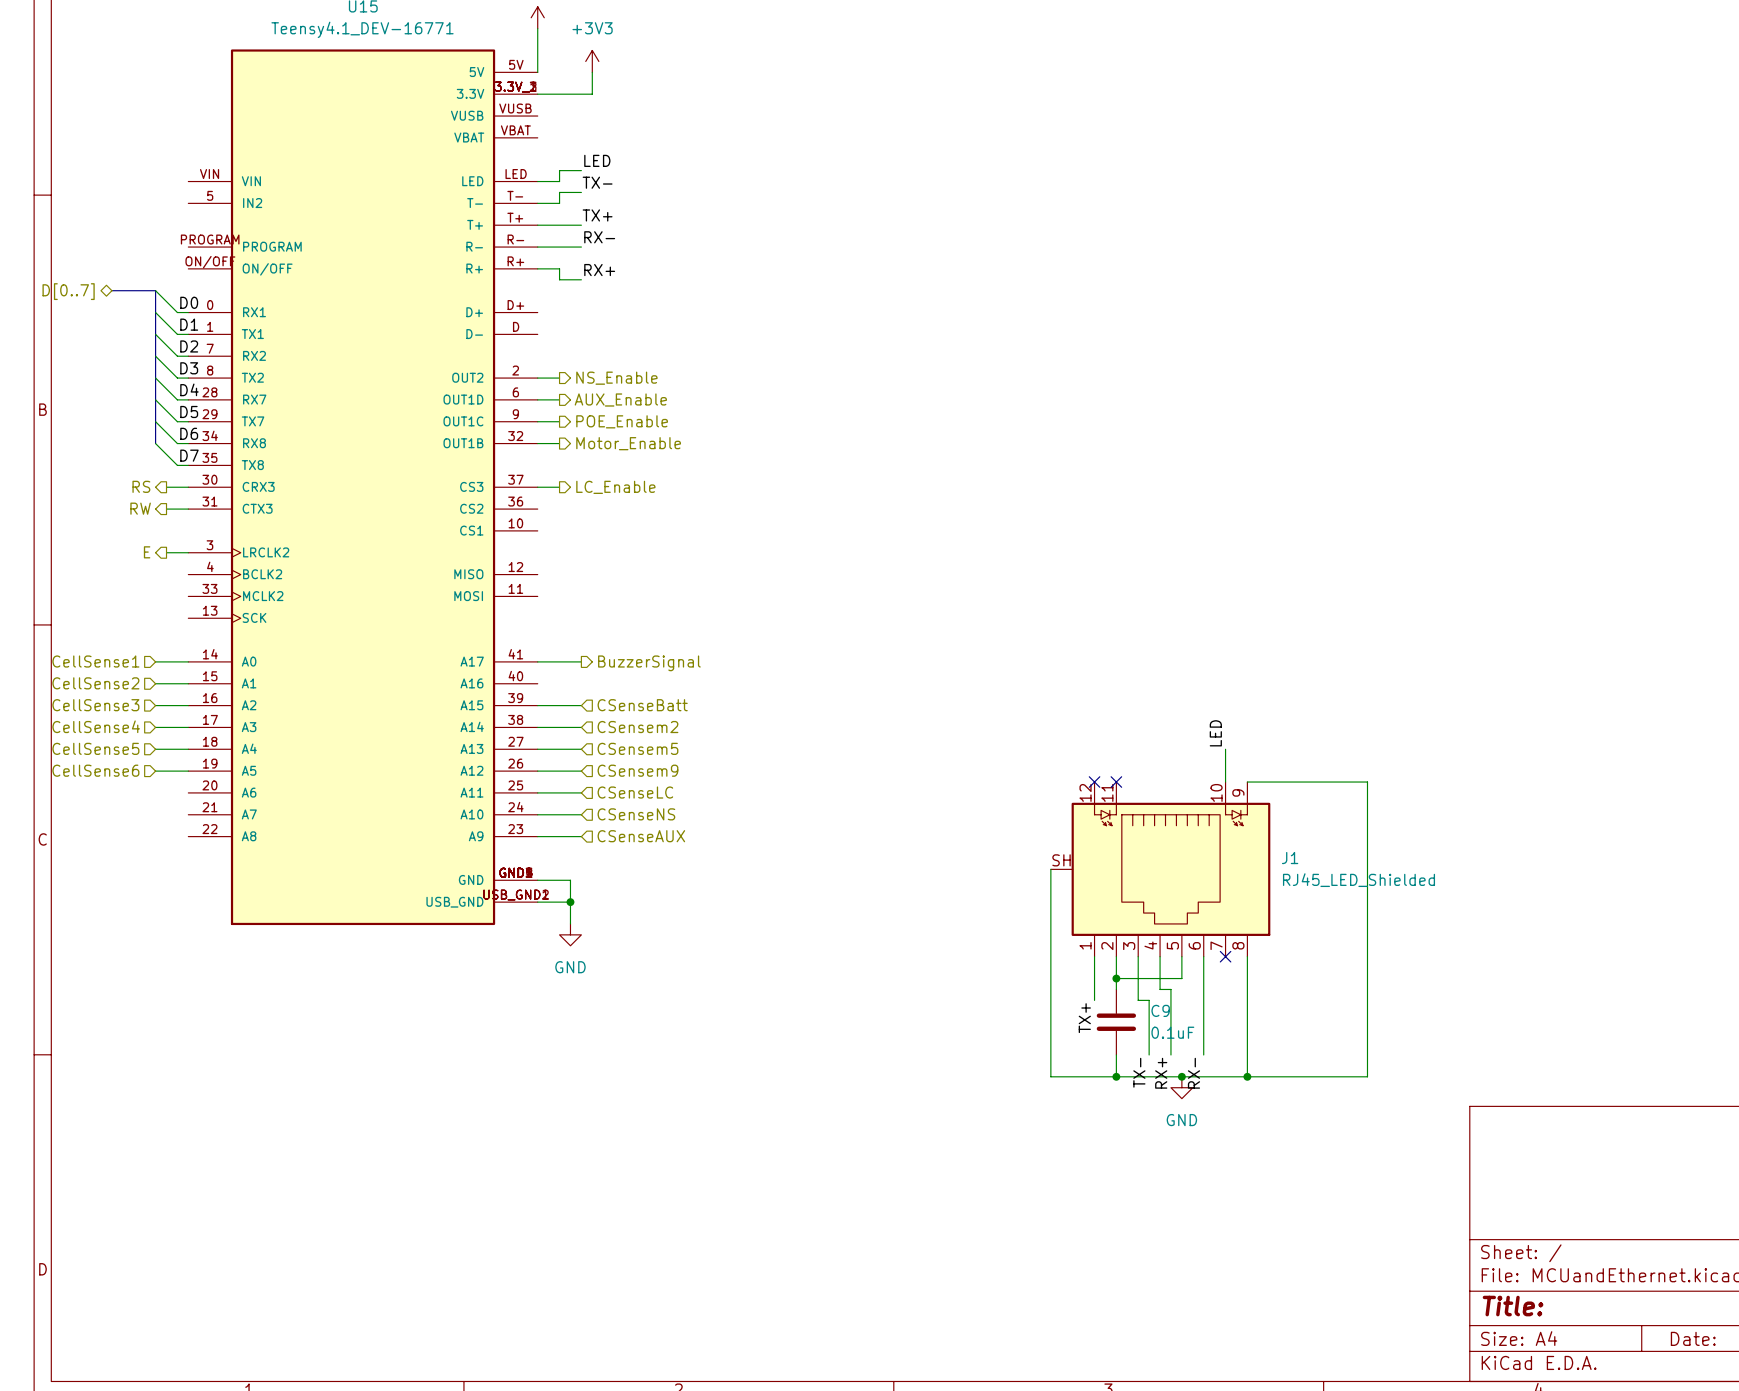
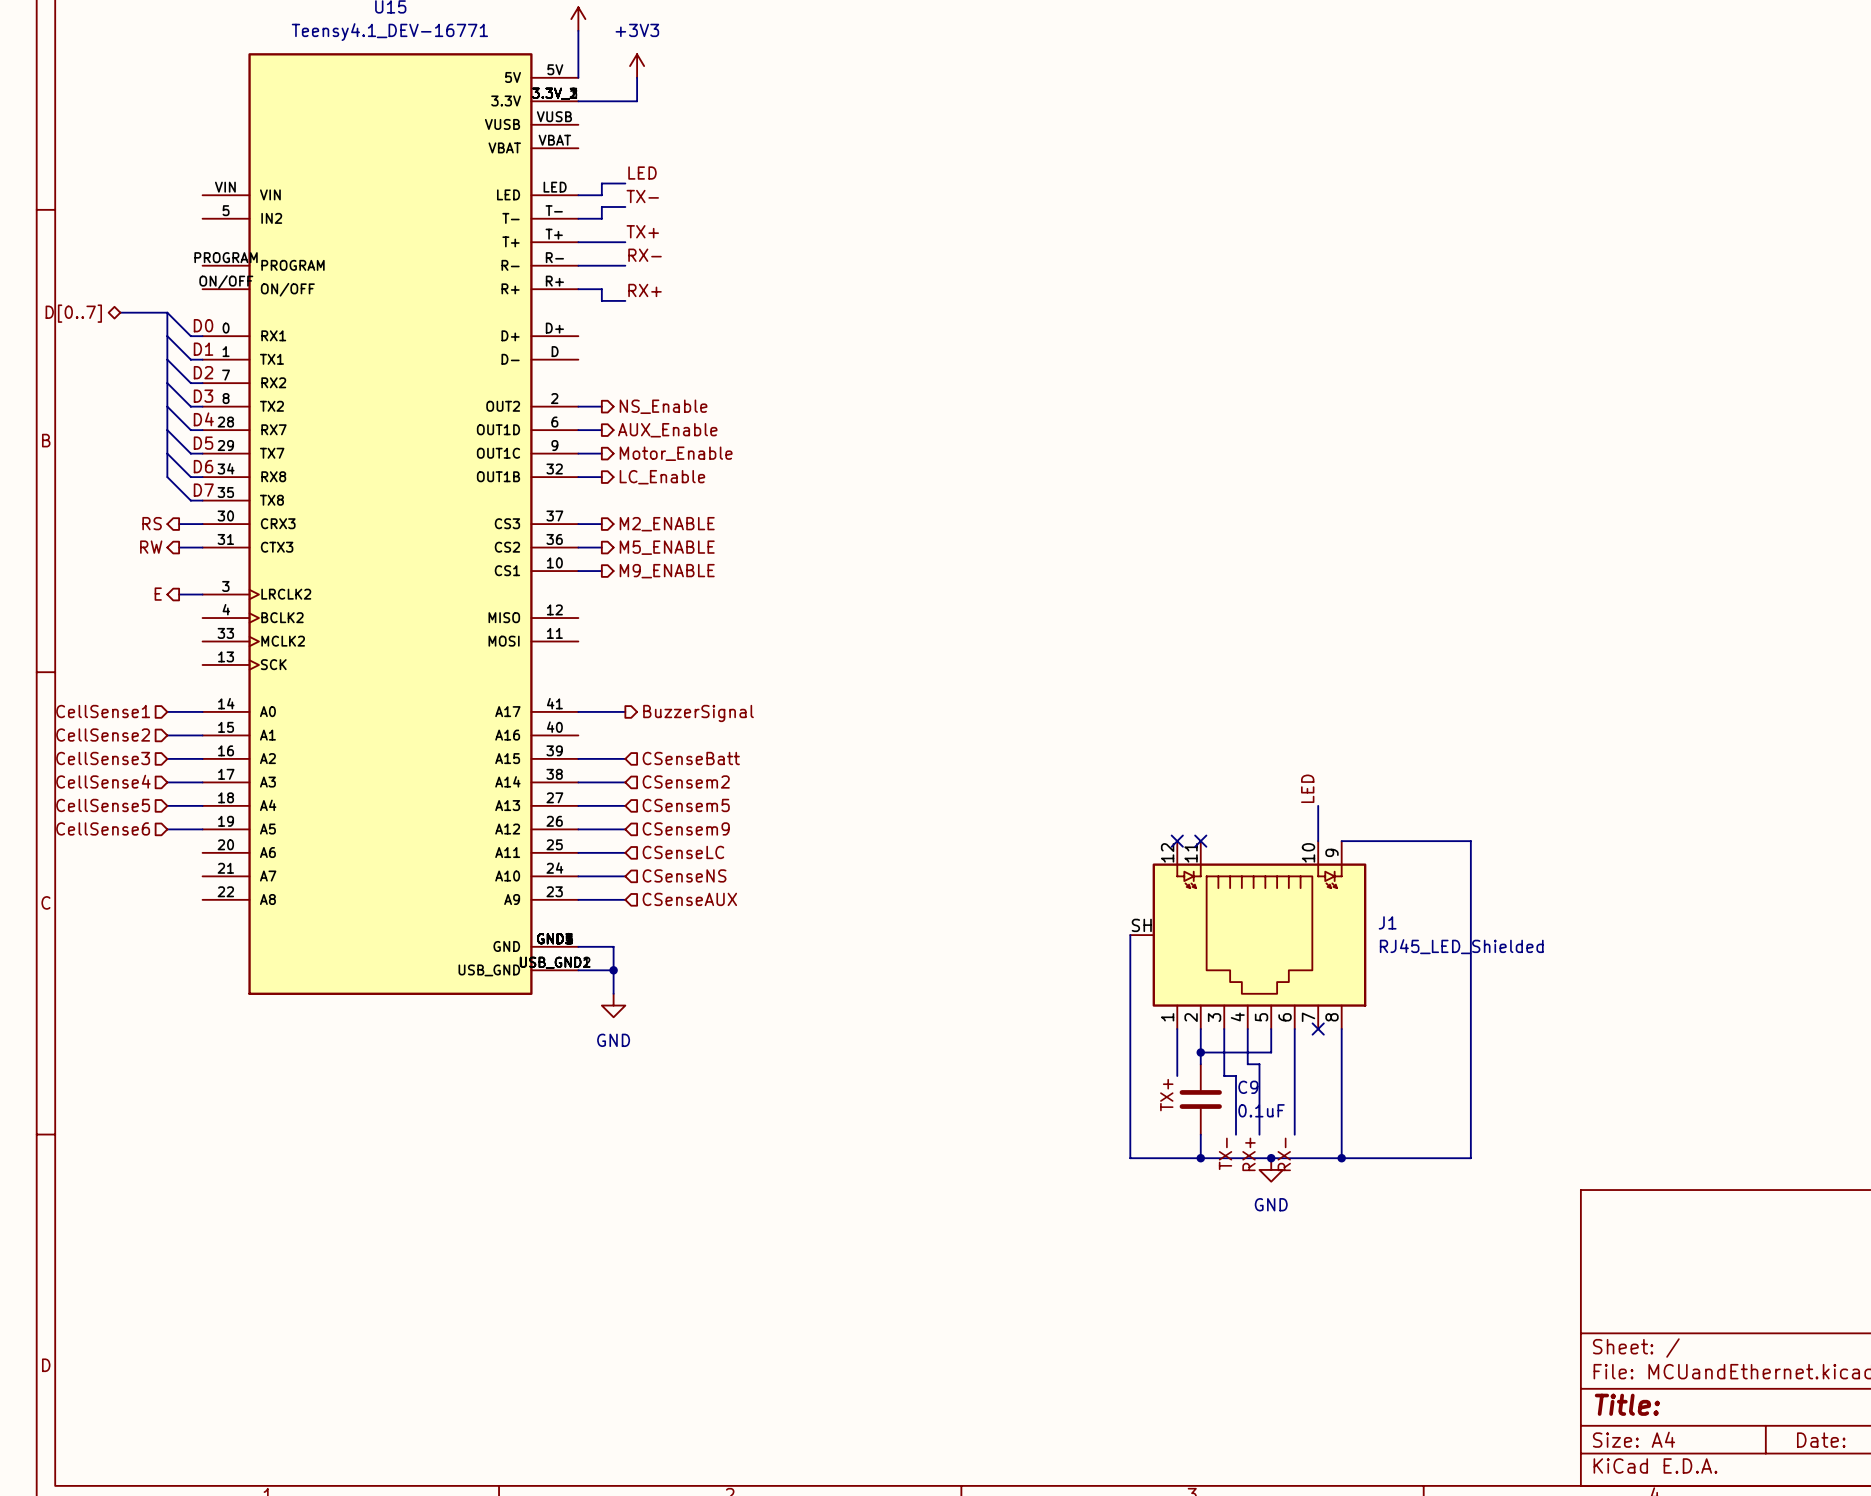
hierarchical label: POE_Enable (622, 421) -> Motor_Enable (676, 453)
hierarchical label: Motor_Enable (628, 443) -> LC_Enable (662, 477)
hierarchical label: LC_Enable (615, 487) -> M2_ENABLE (667, 524)
wire: none -> (578, 547) (601, 547)
hierarchical label: none -> M5_ENABLE (667, 547)
wire: none -> (578, 571) (601, 571)
hierarchical label: none -> M9_ENABLE (667, 571)

